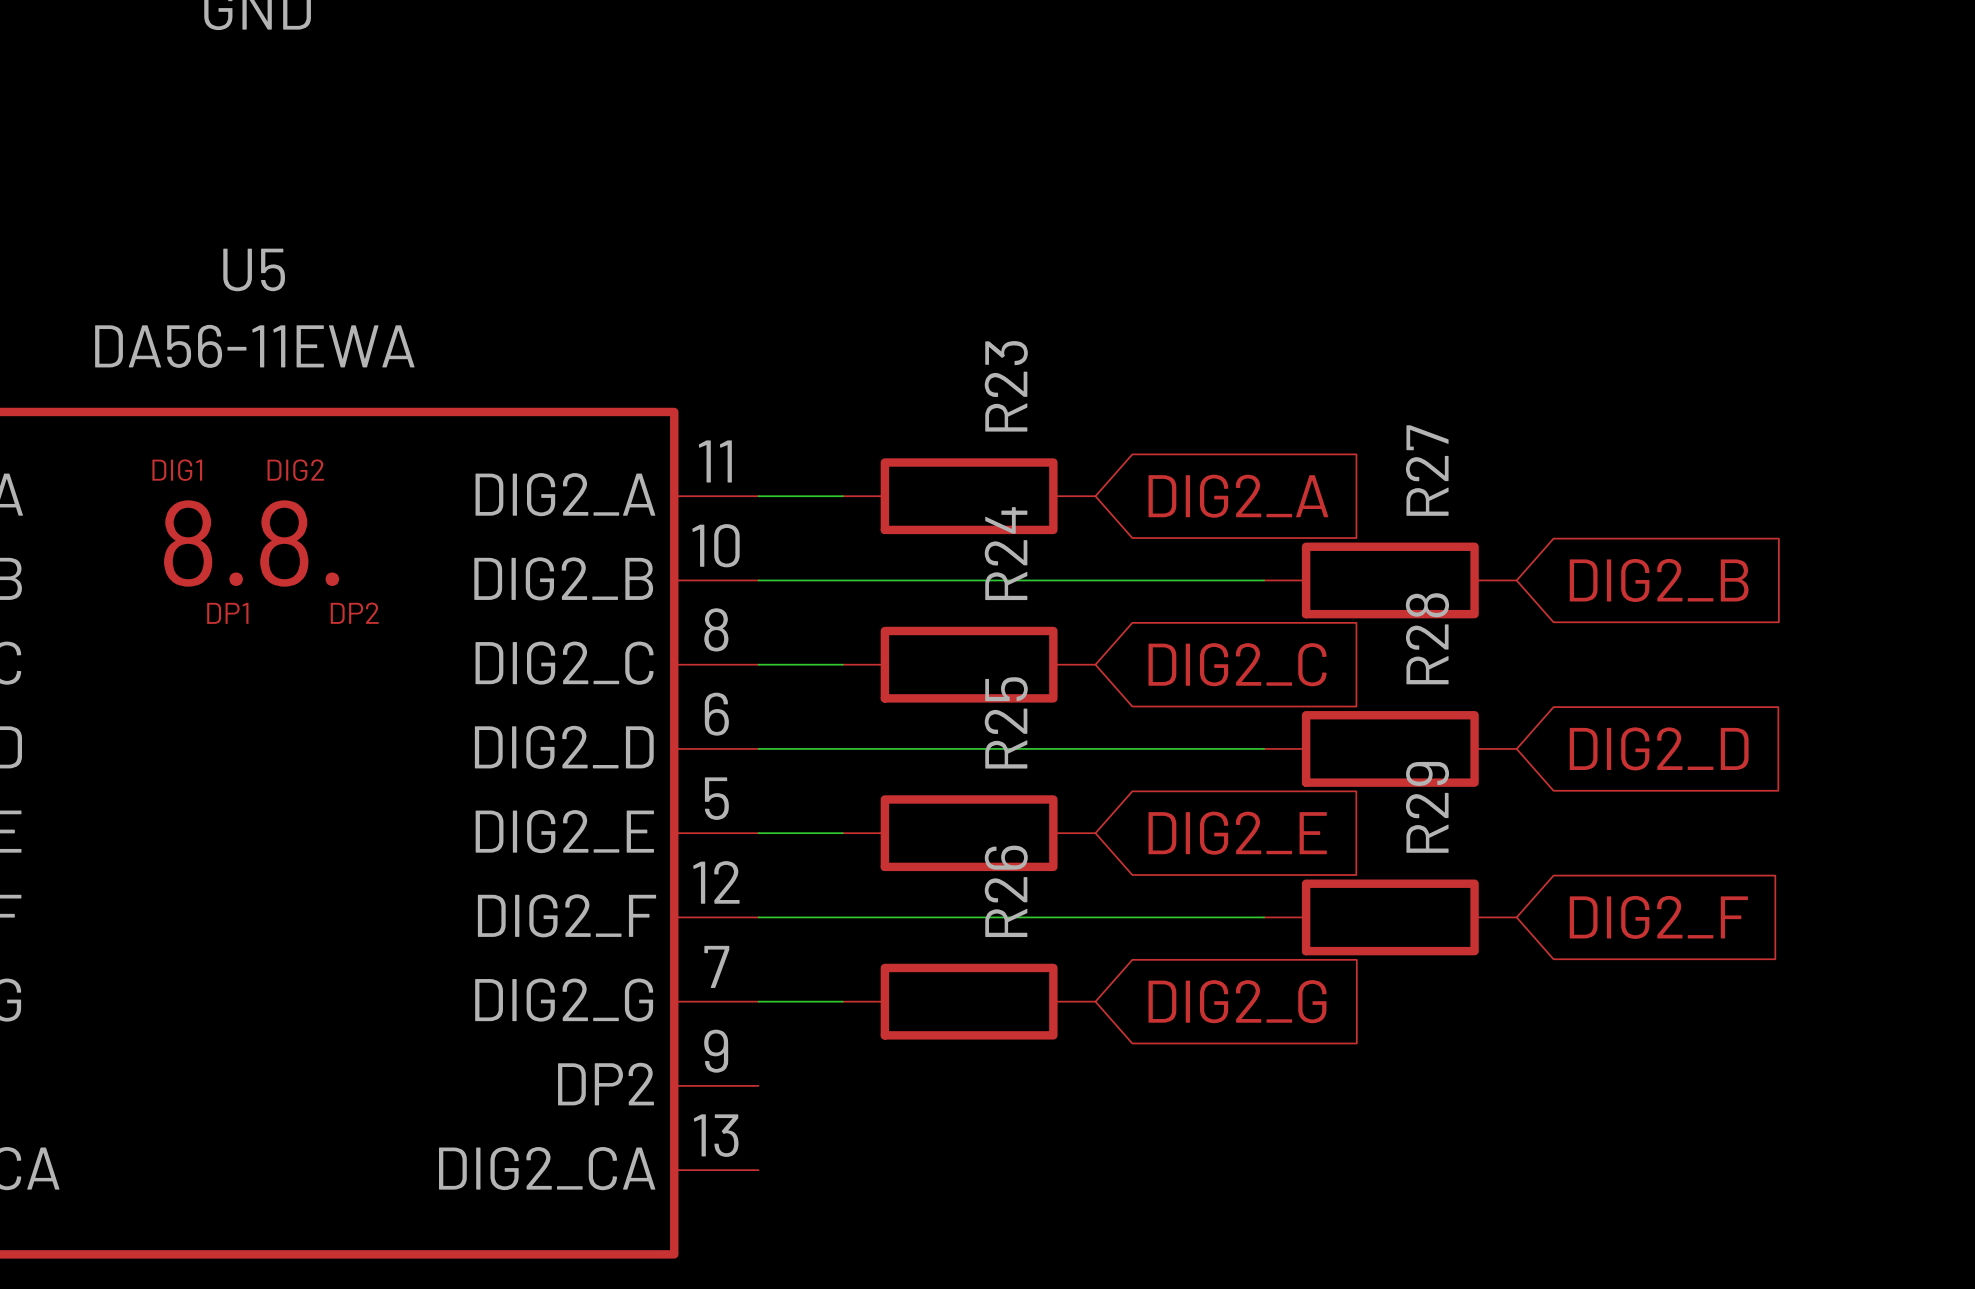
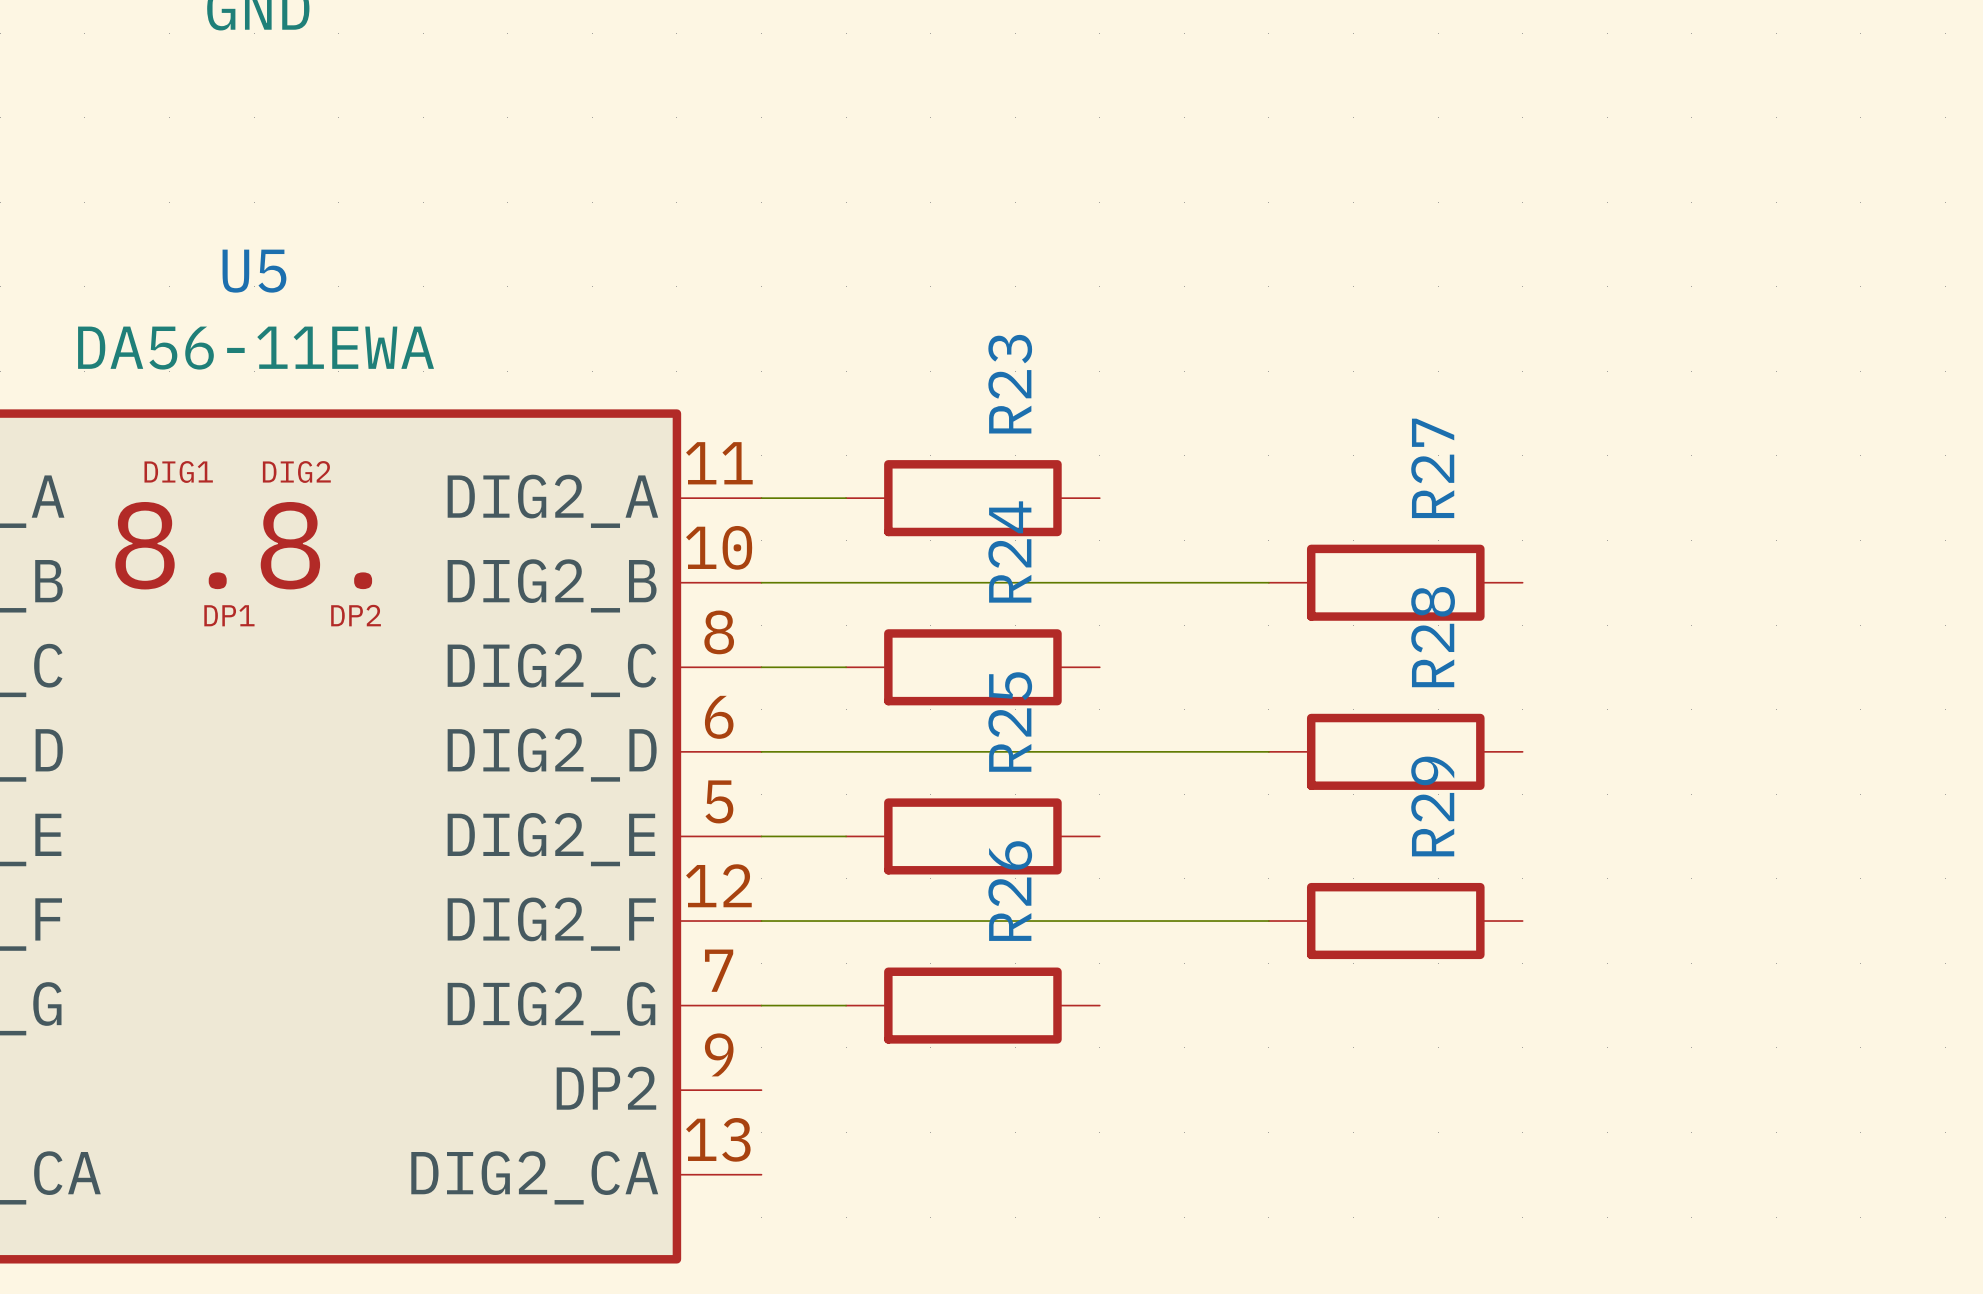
global label: DIG2_A (1238, 496) -> none
global label: DIG2_B (1659, 580) -> none
global label: DIG2_C (1237, 664) -> none
global label: DIG2_D (1659, 748) -> none
global label: DIG2_E (1237, 833) -> none
global label: DIG2_F (1658, 917) -> none
global label: DIG2_G (1237, 1001) -> none

